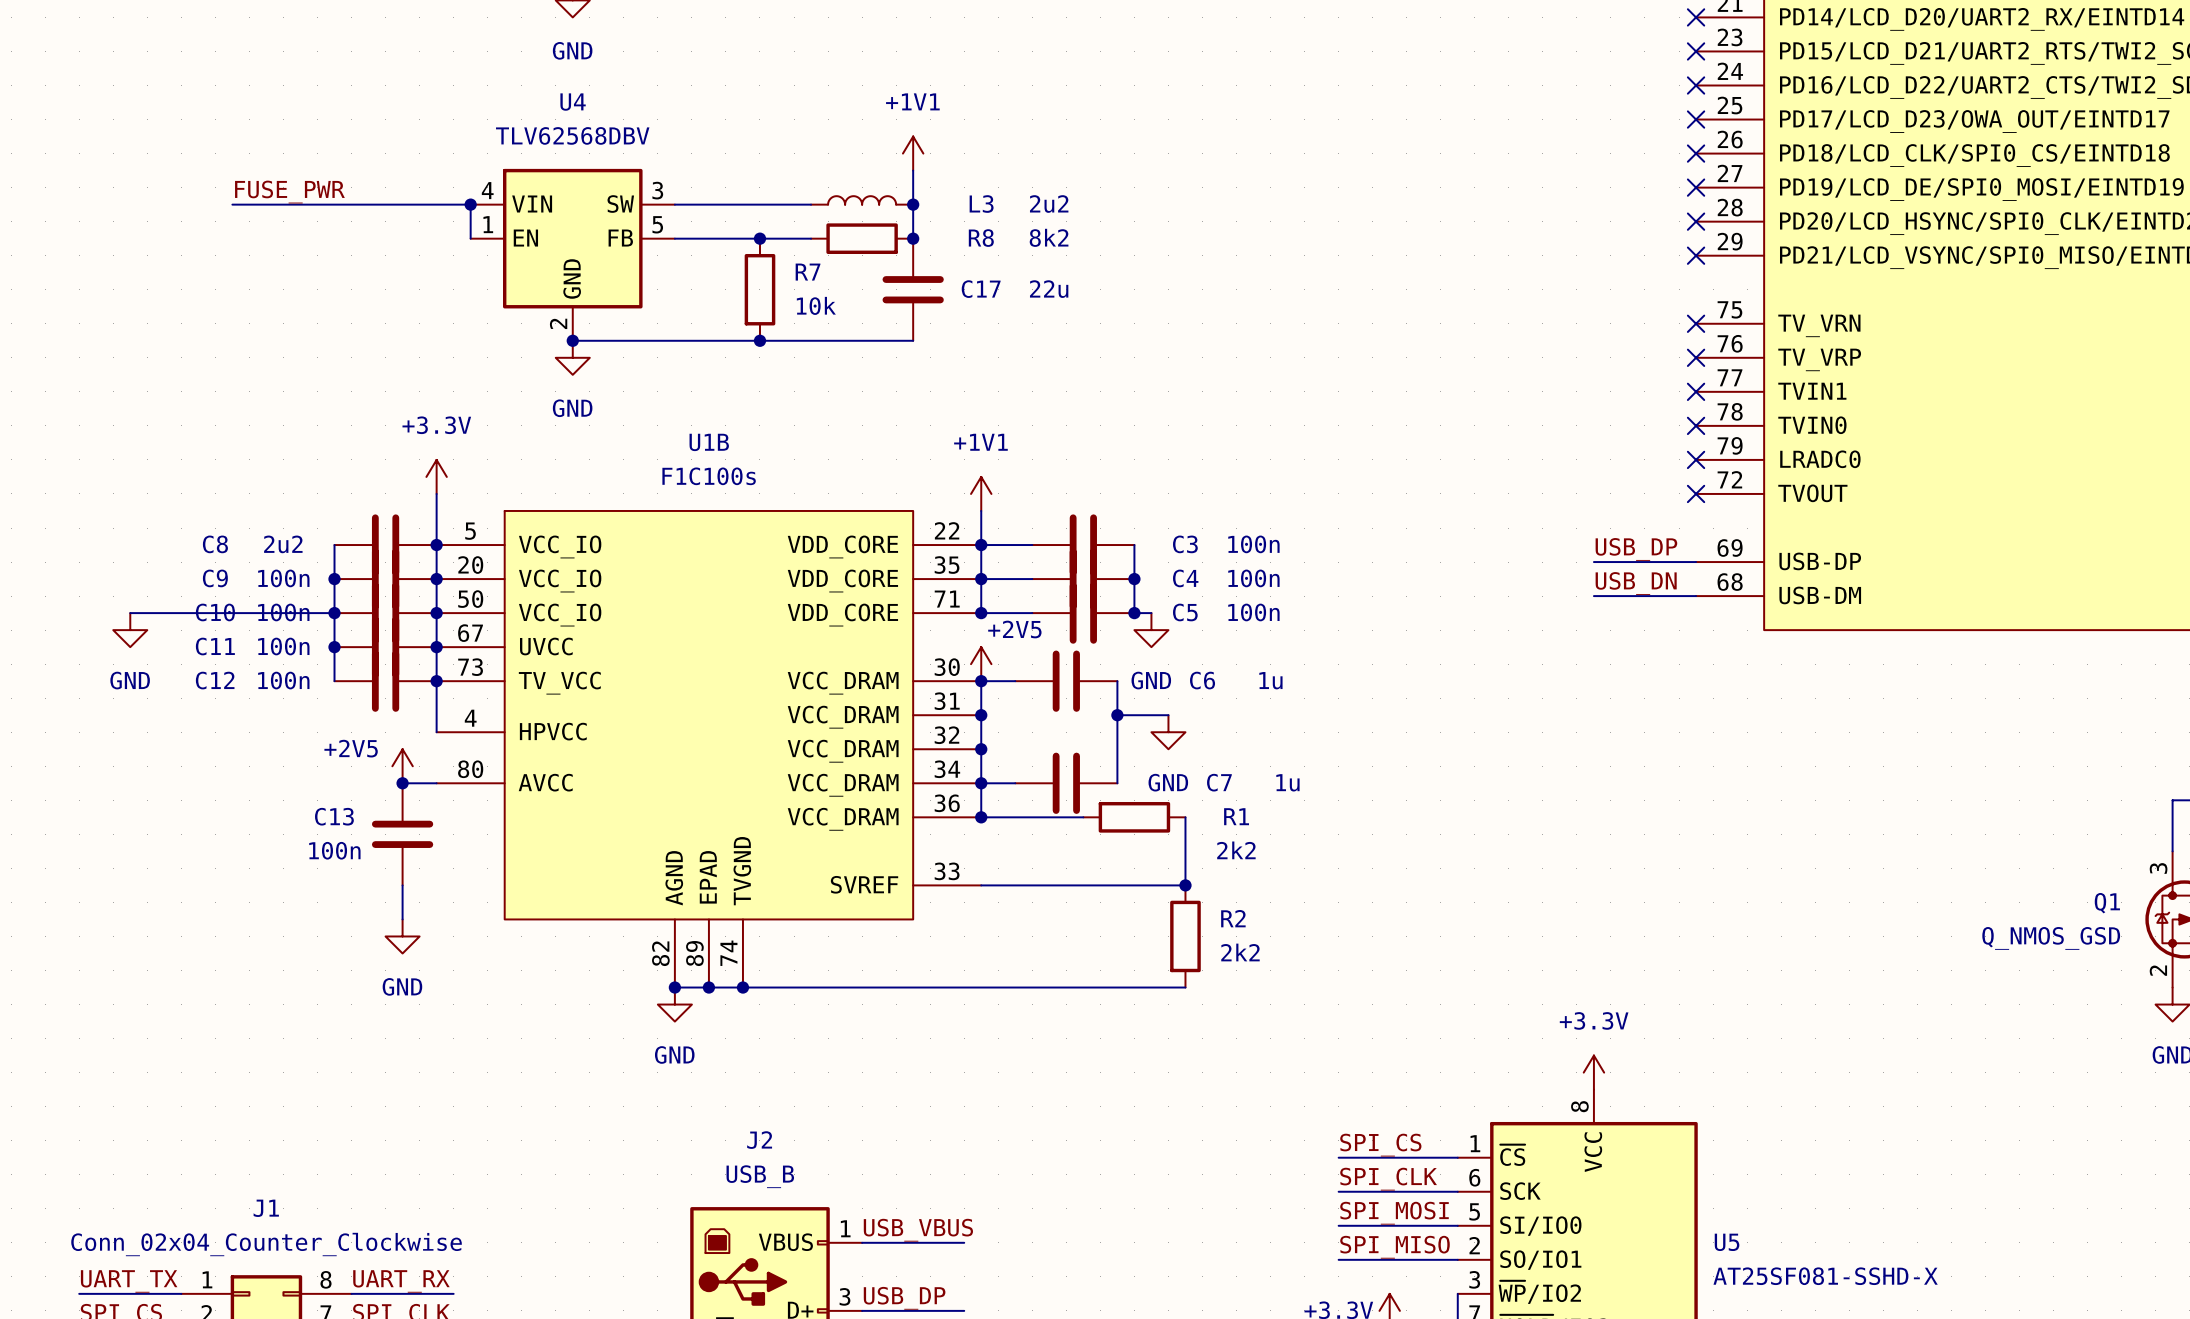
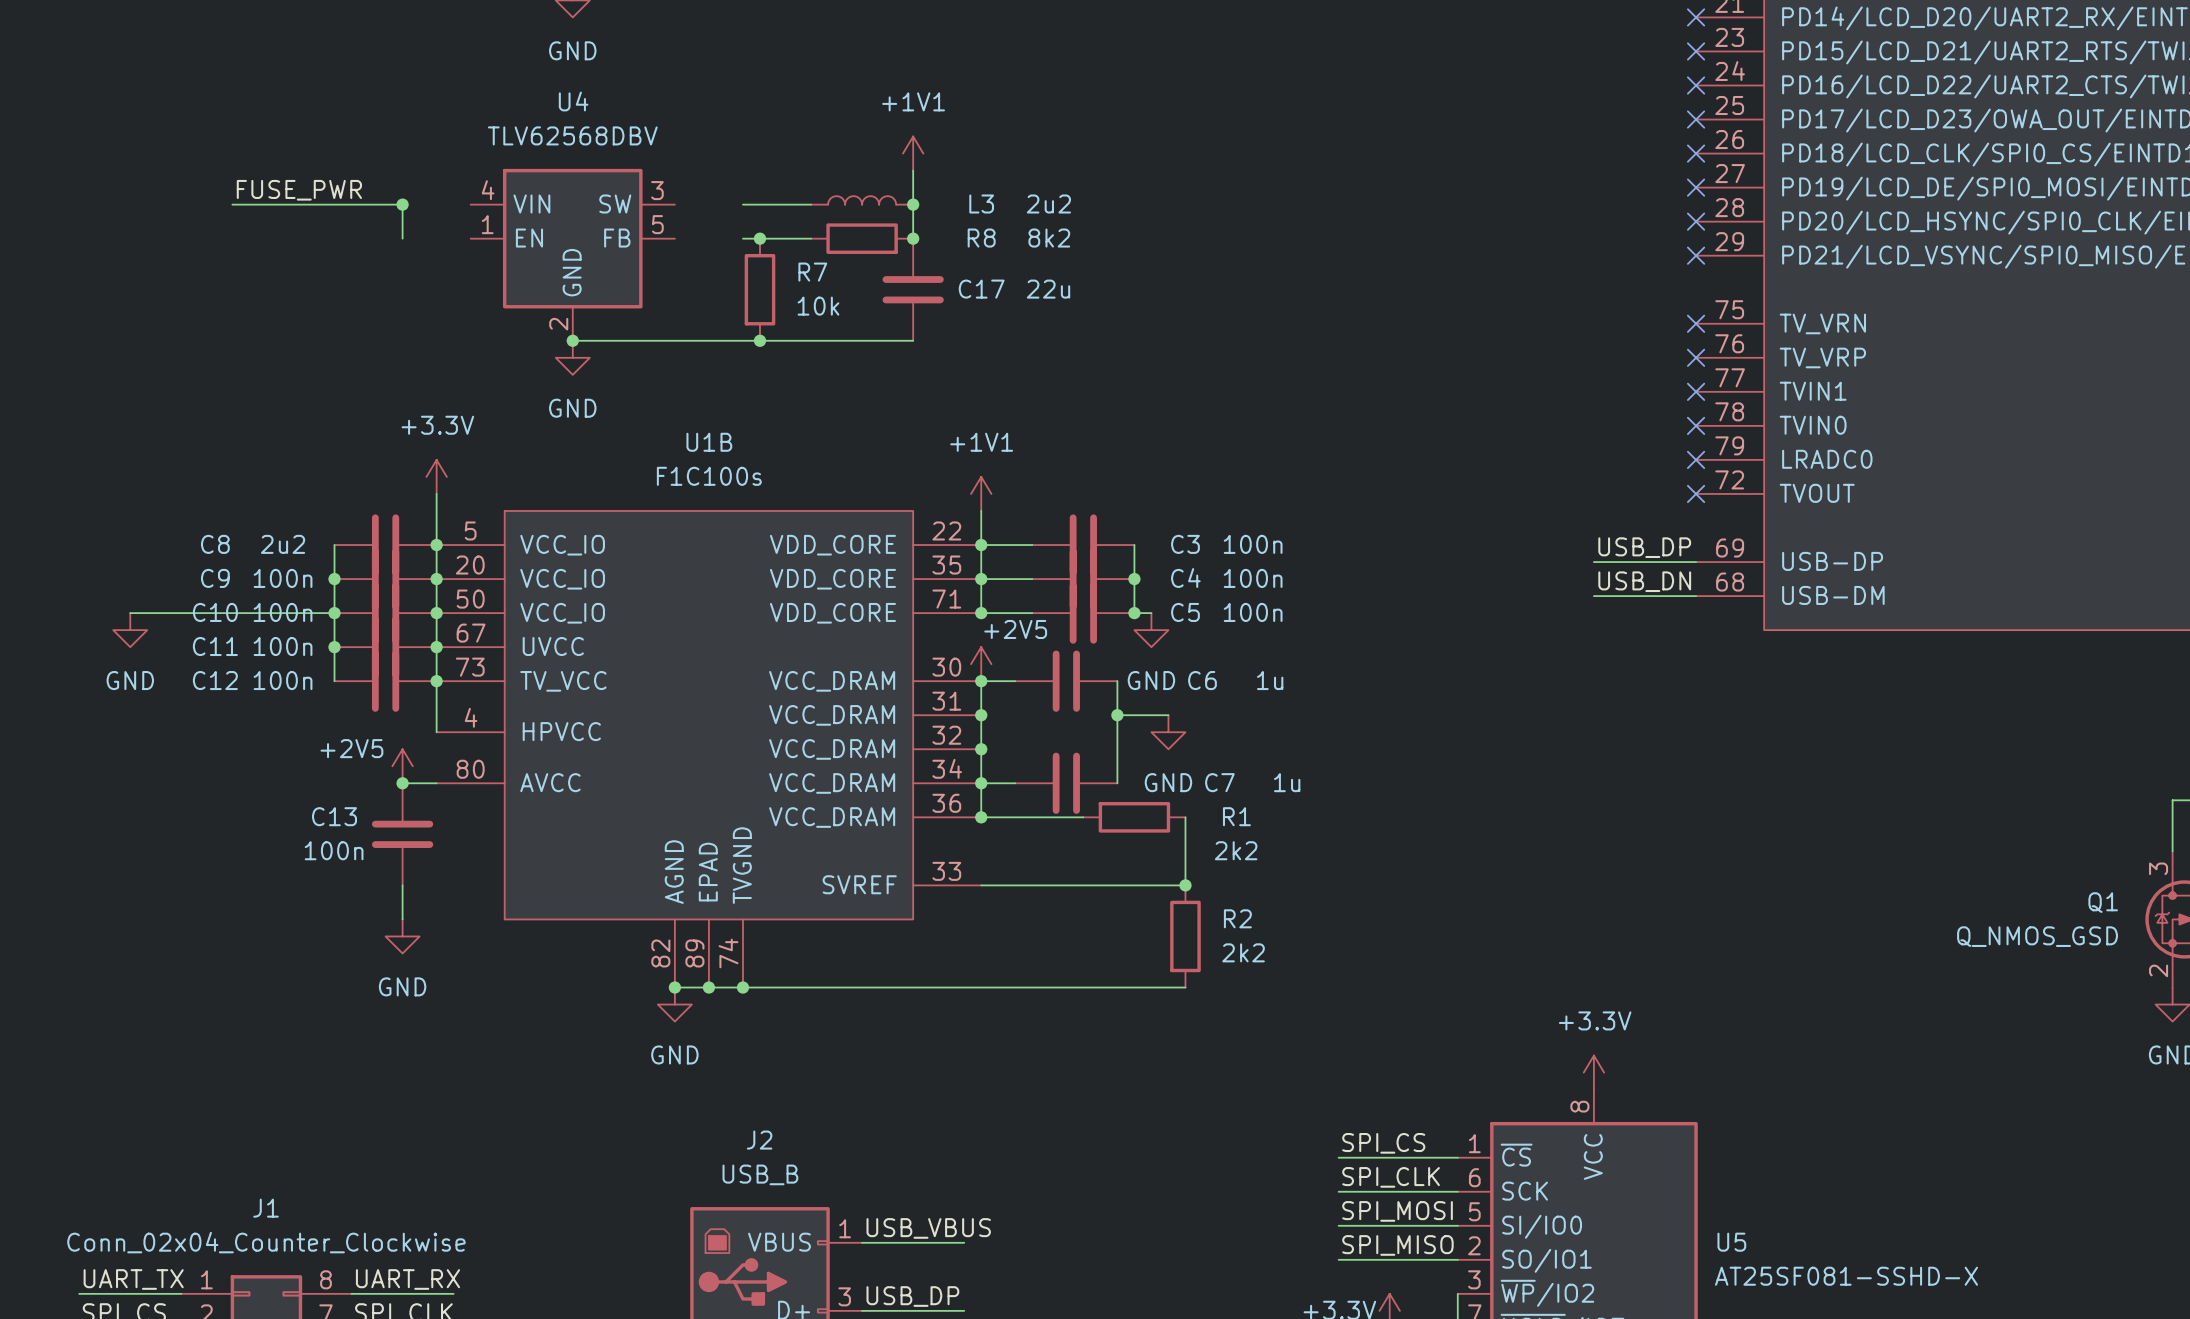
wire: (402, 204) (470, 204) (470, 238) -> (402, 204) (402, 238)
junction position: (470, 204) -> (402, 204)
wire: (674, 204) (742, 204) -> none
wire: (674, 238) (742, 238) -> none

